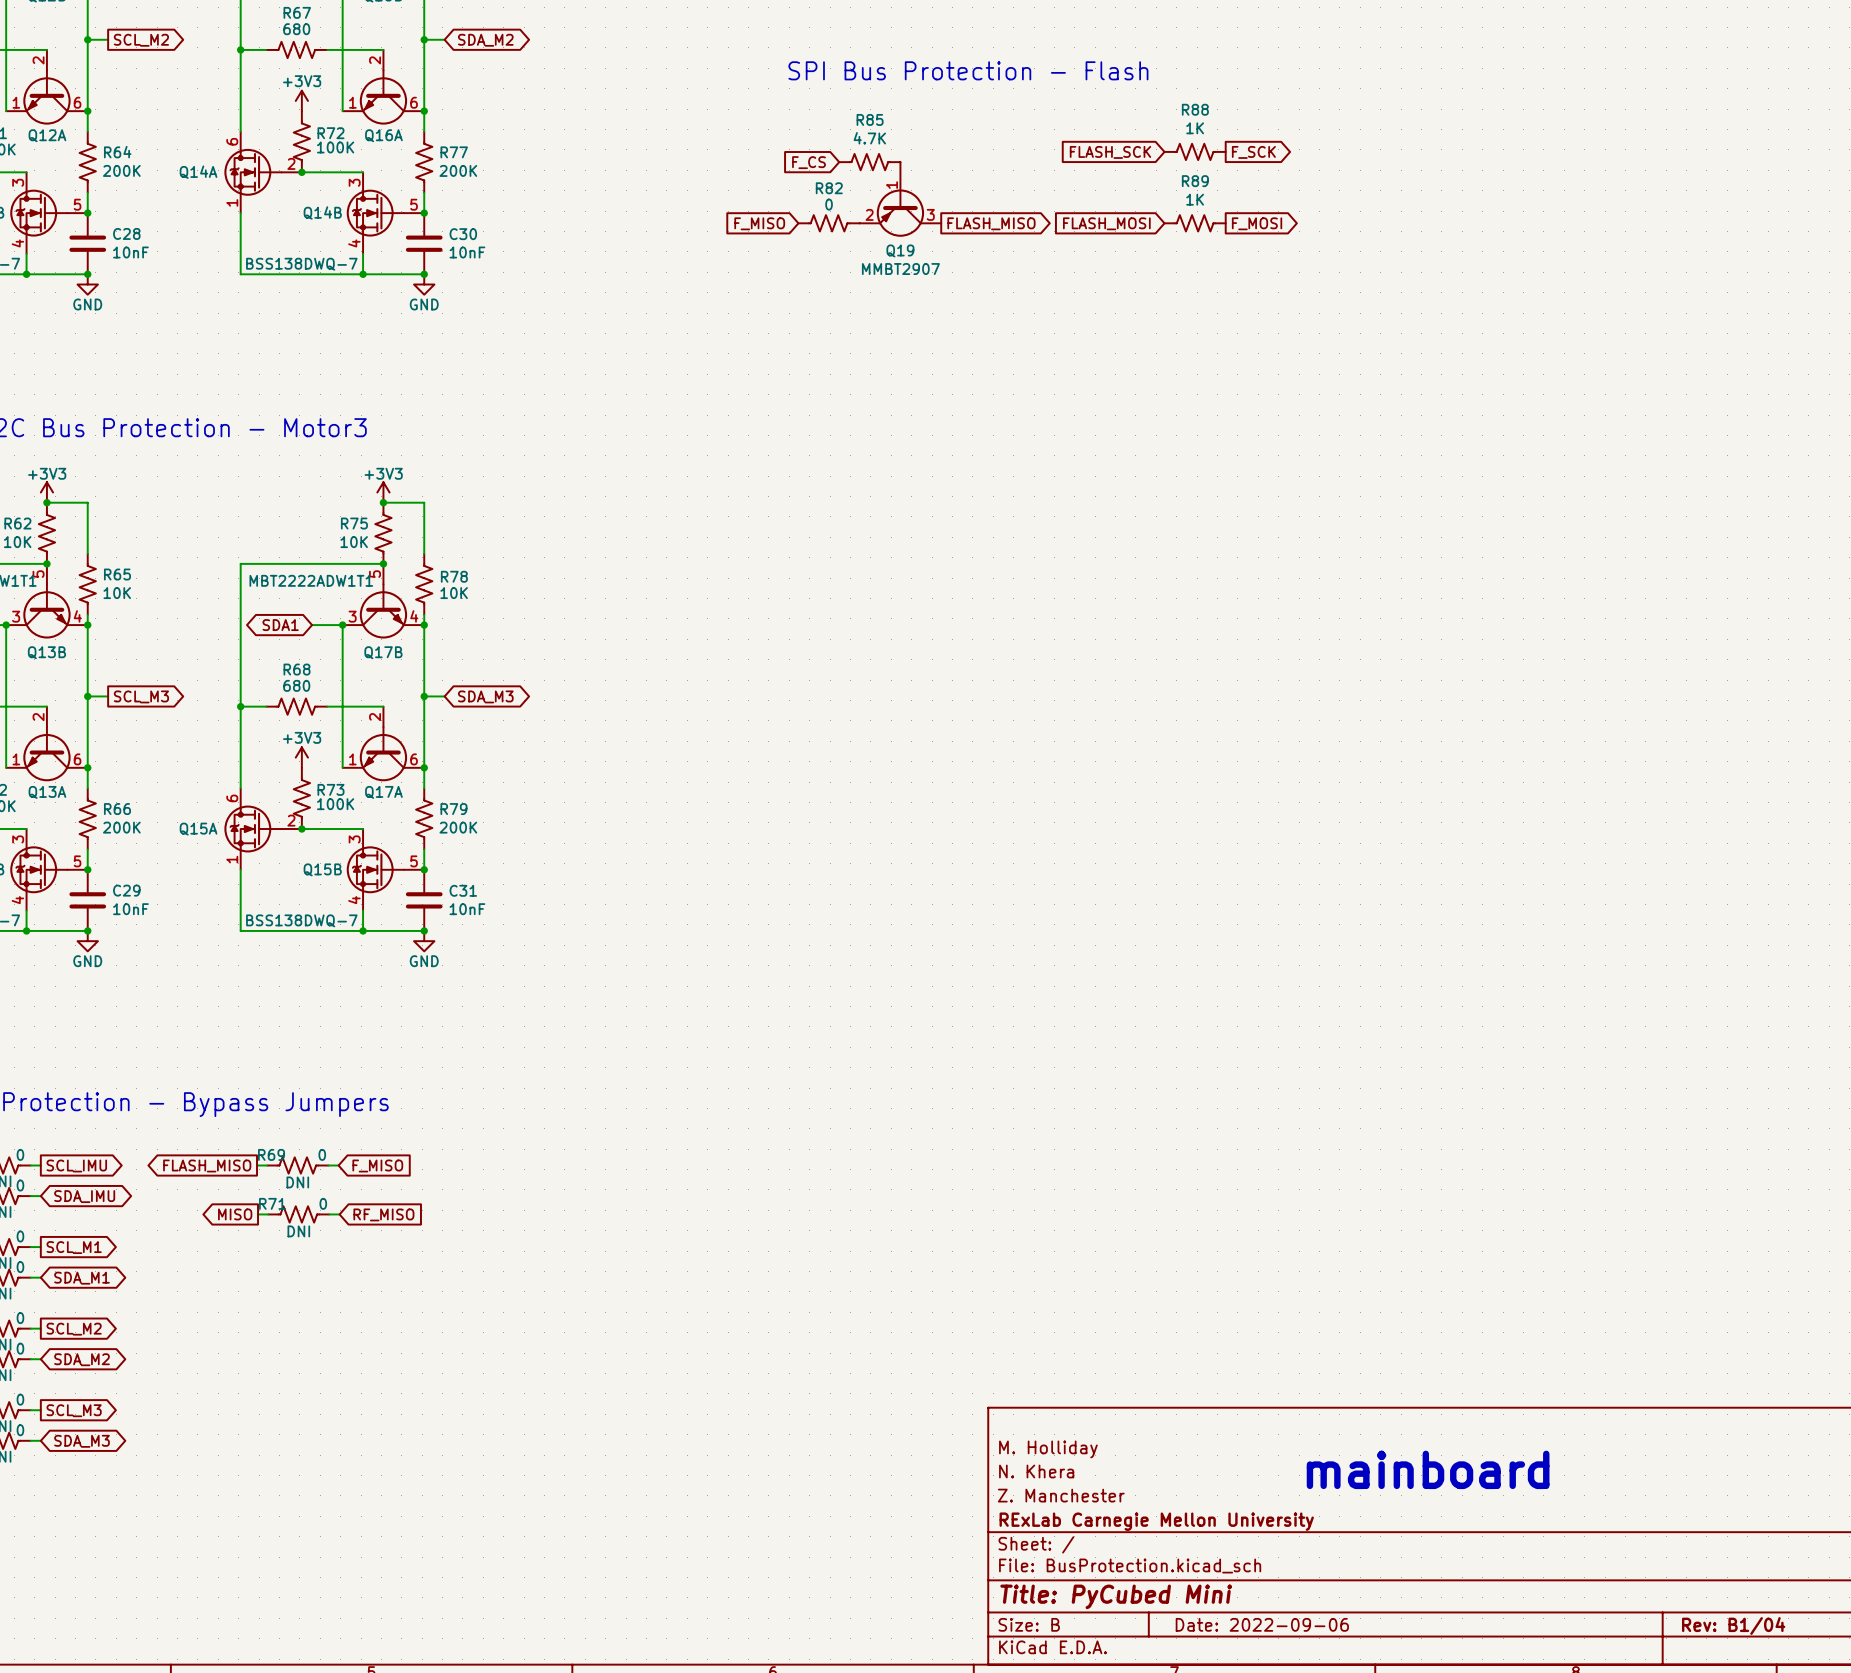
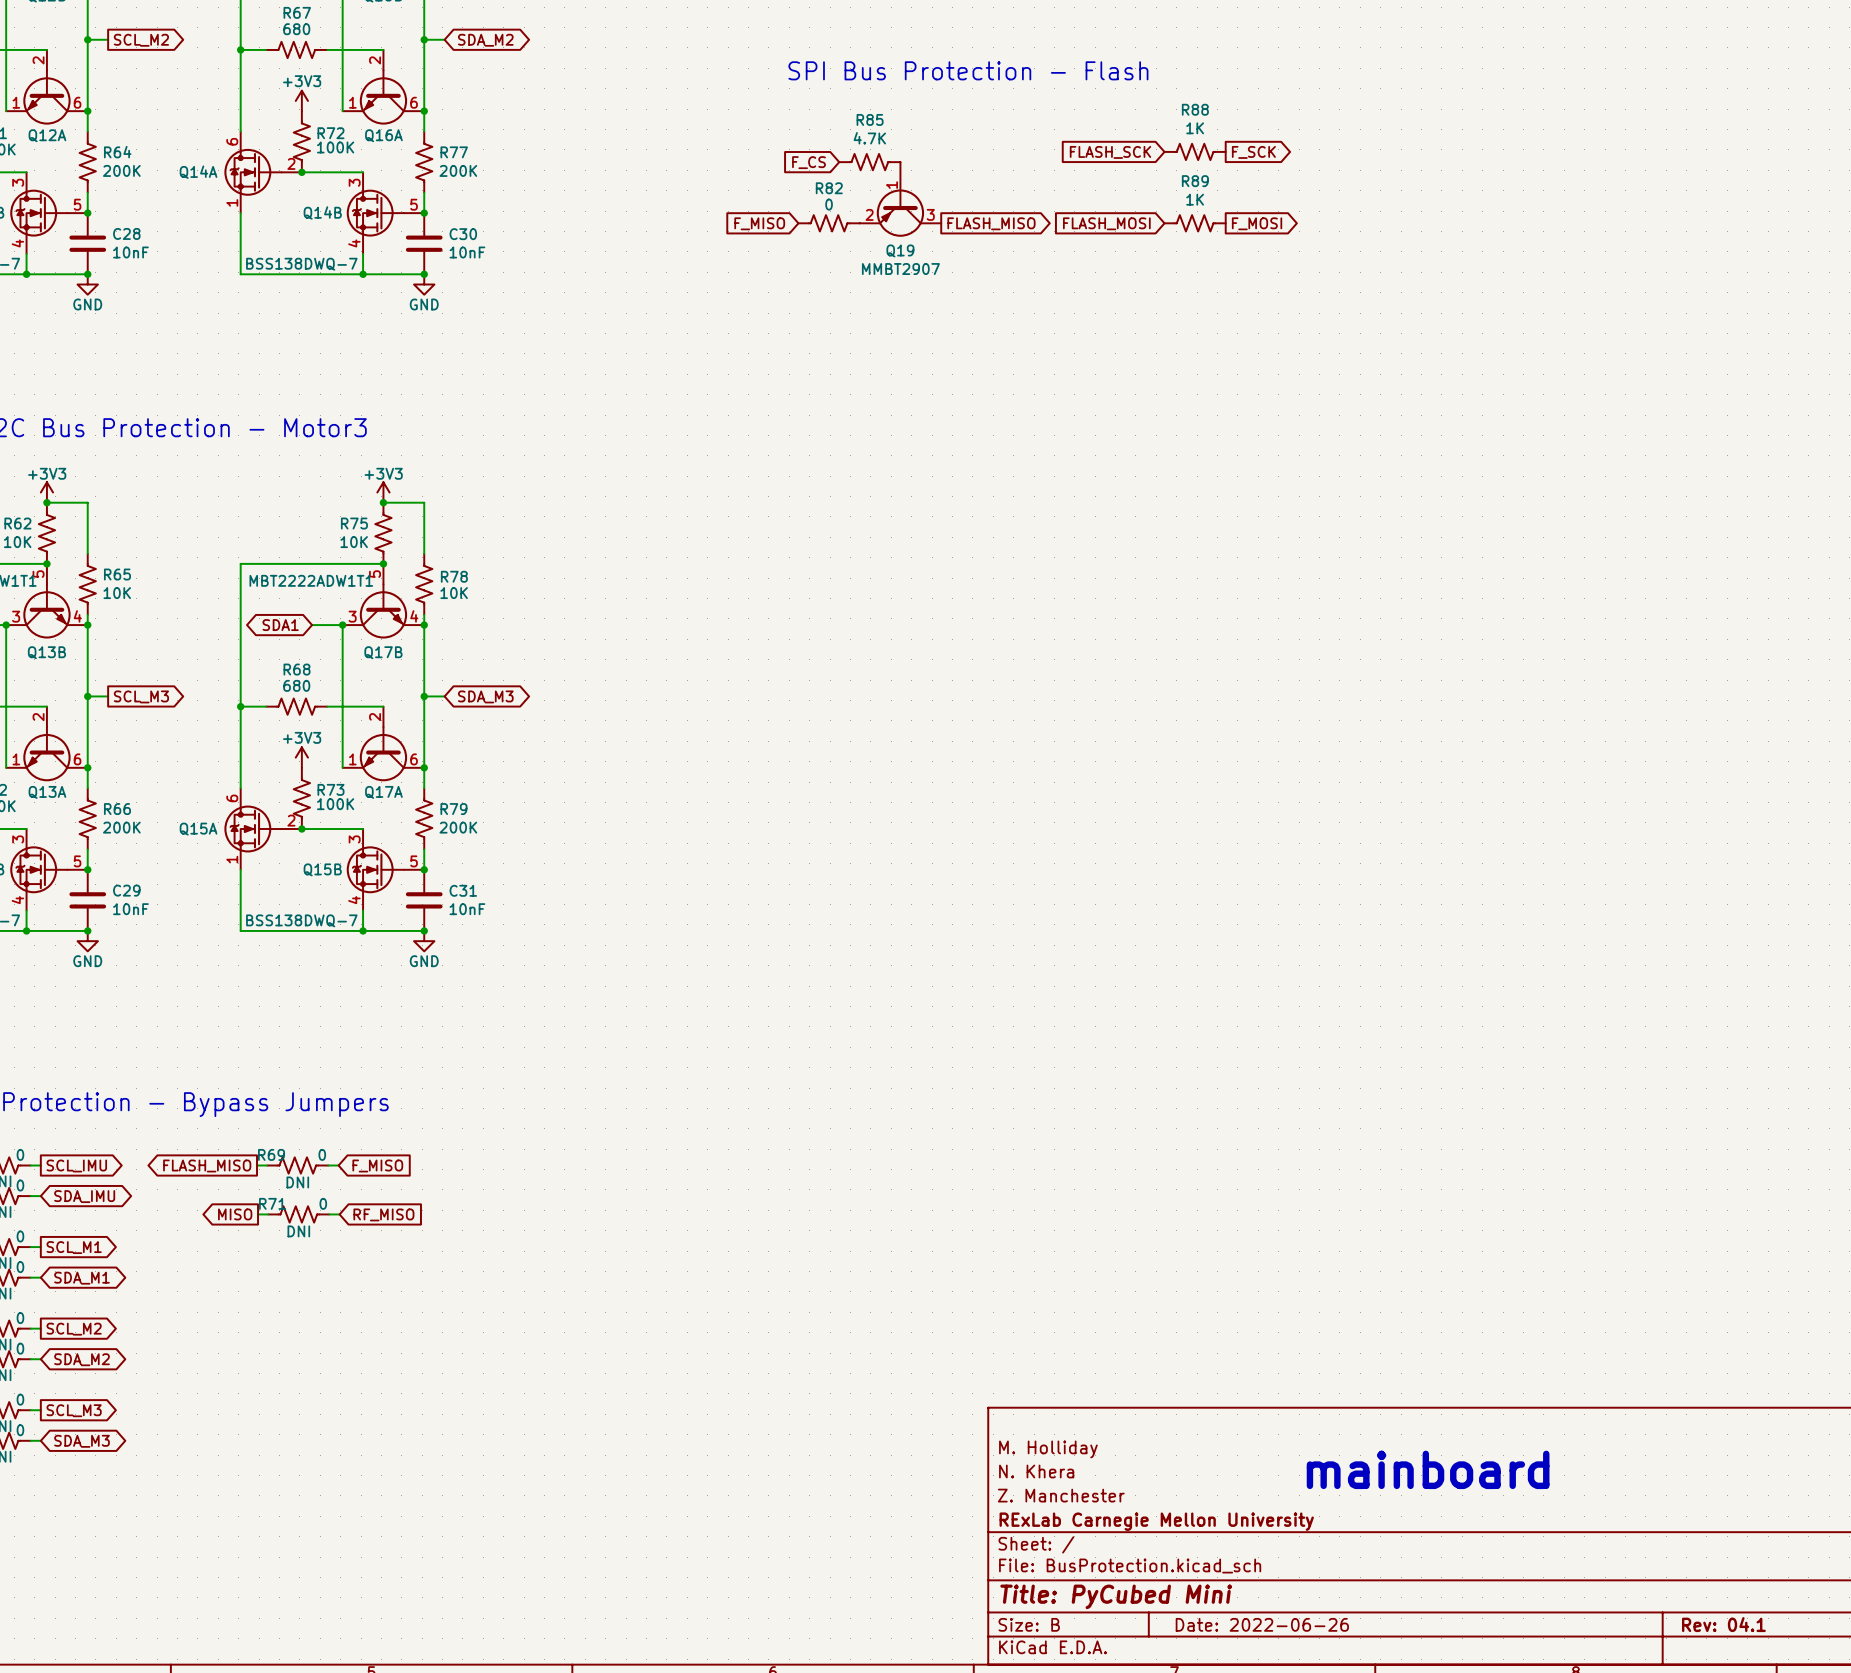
title block: Date: 2022-09-06 (1262, 1624) -> Date: 2022-06-26 (1262, 1624)
title block: Rev: B1/04 (1733, 1626) -> Rev: 04.1 (1723, 1624)

